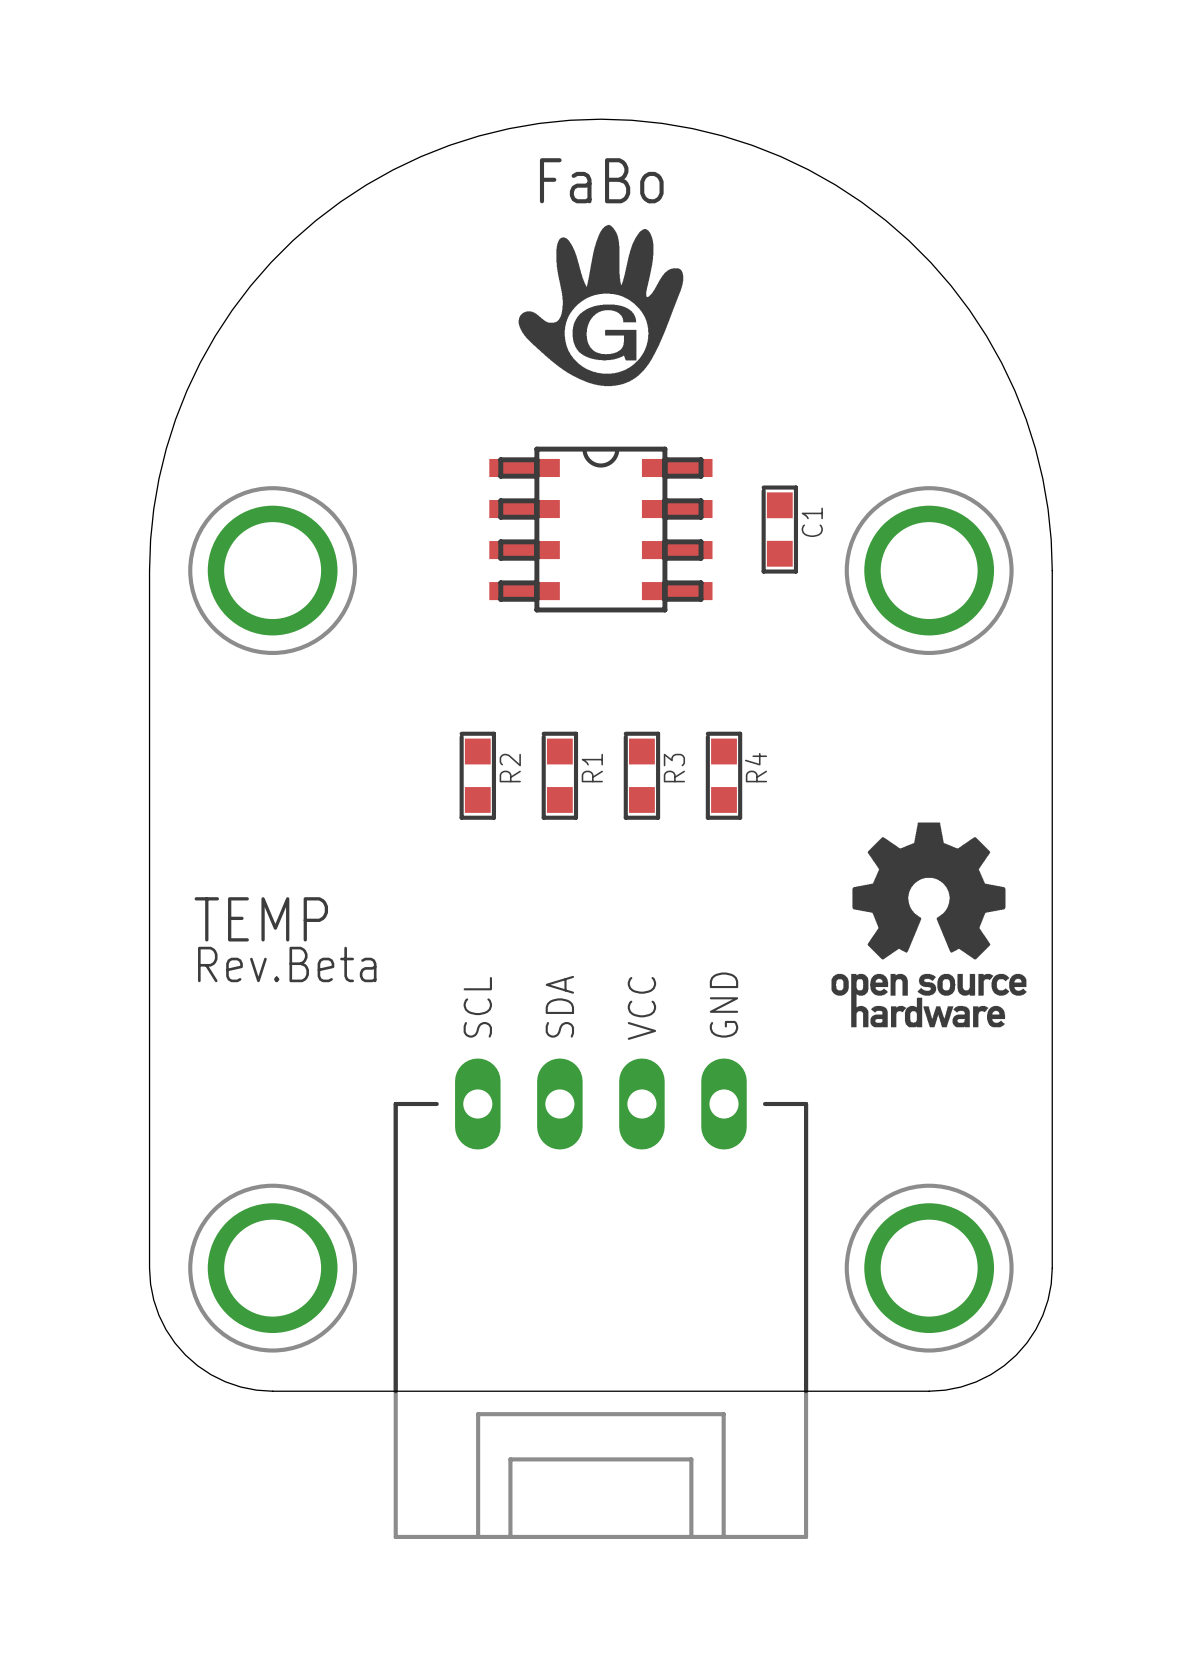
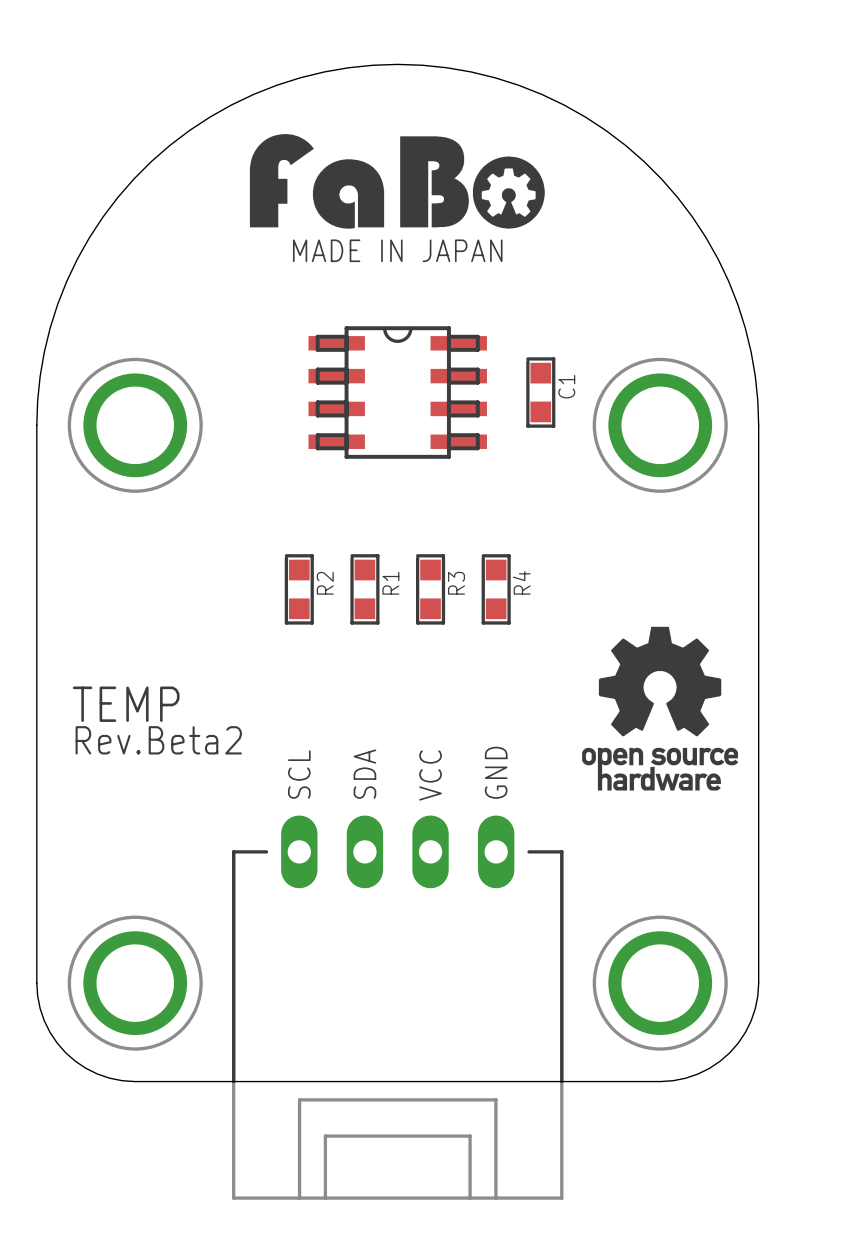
drawing: none -> [249, 134, 545, 229]
drawing: [518, 224, 684, 387] -> none
text: none -> MADE IN JAPAN (397, 250)
text: Rev.Beta (287, 964) -> Rev.Beta2 (158, 740)

